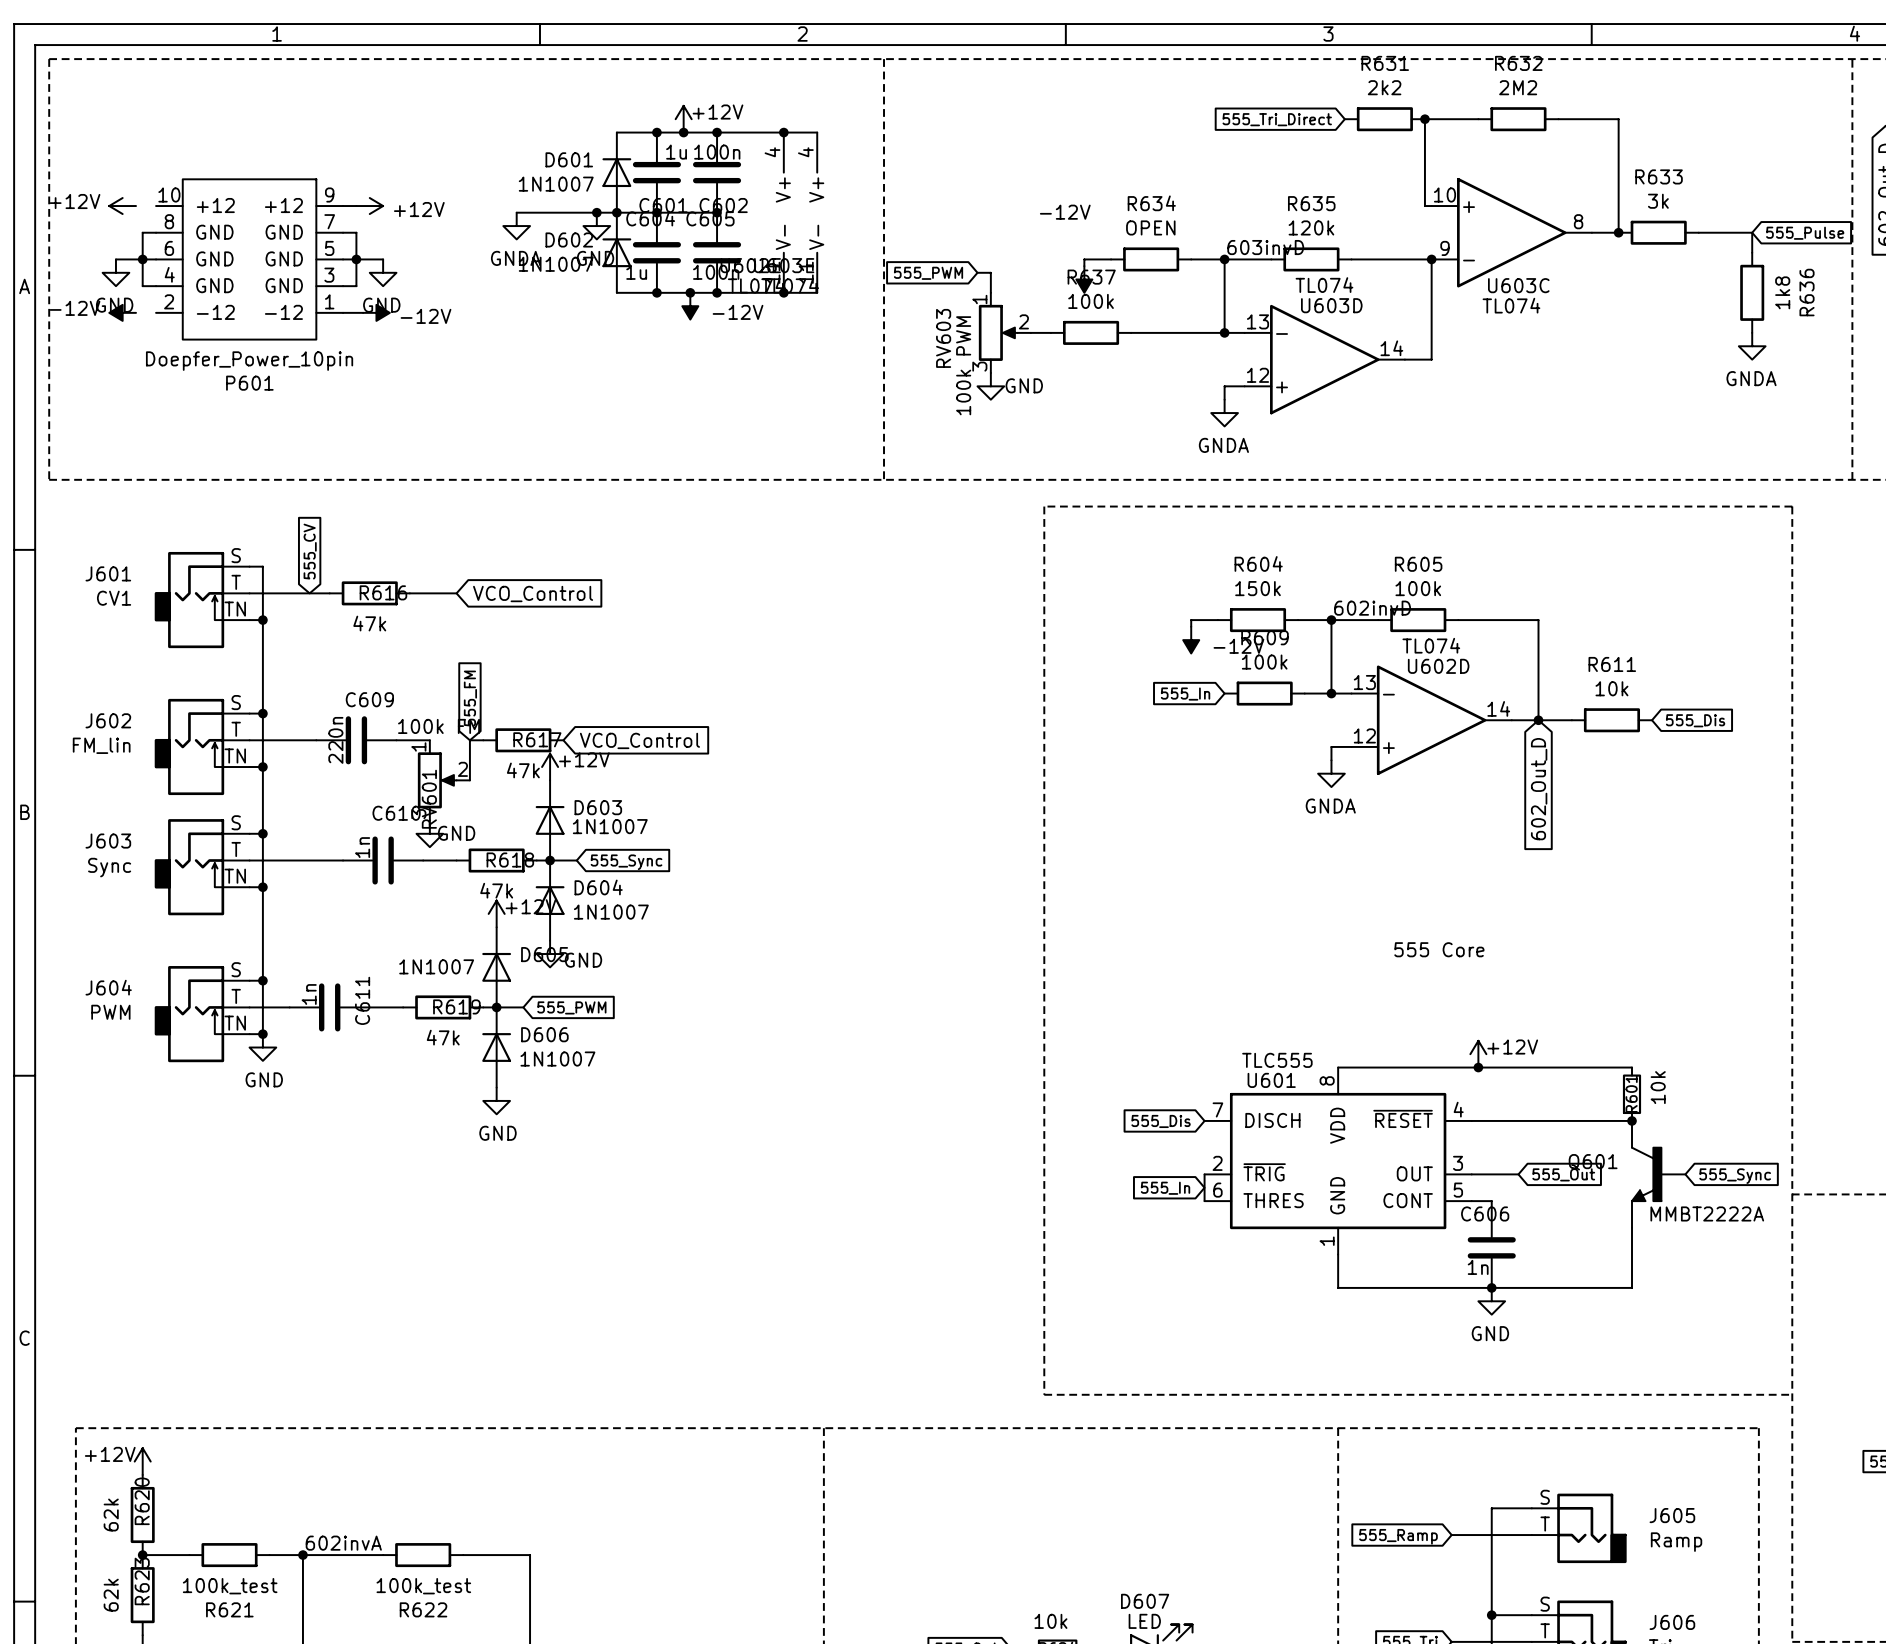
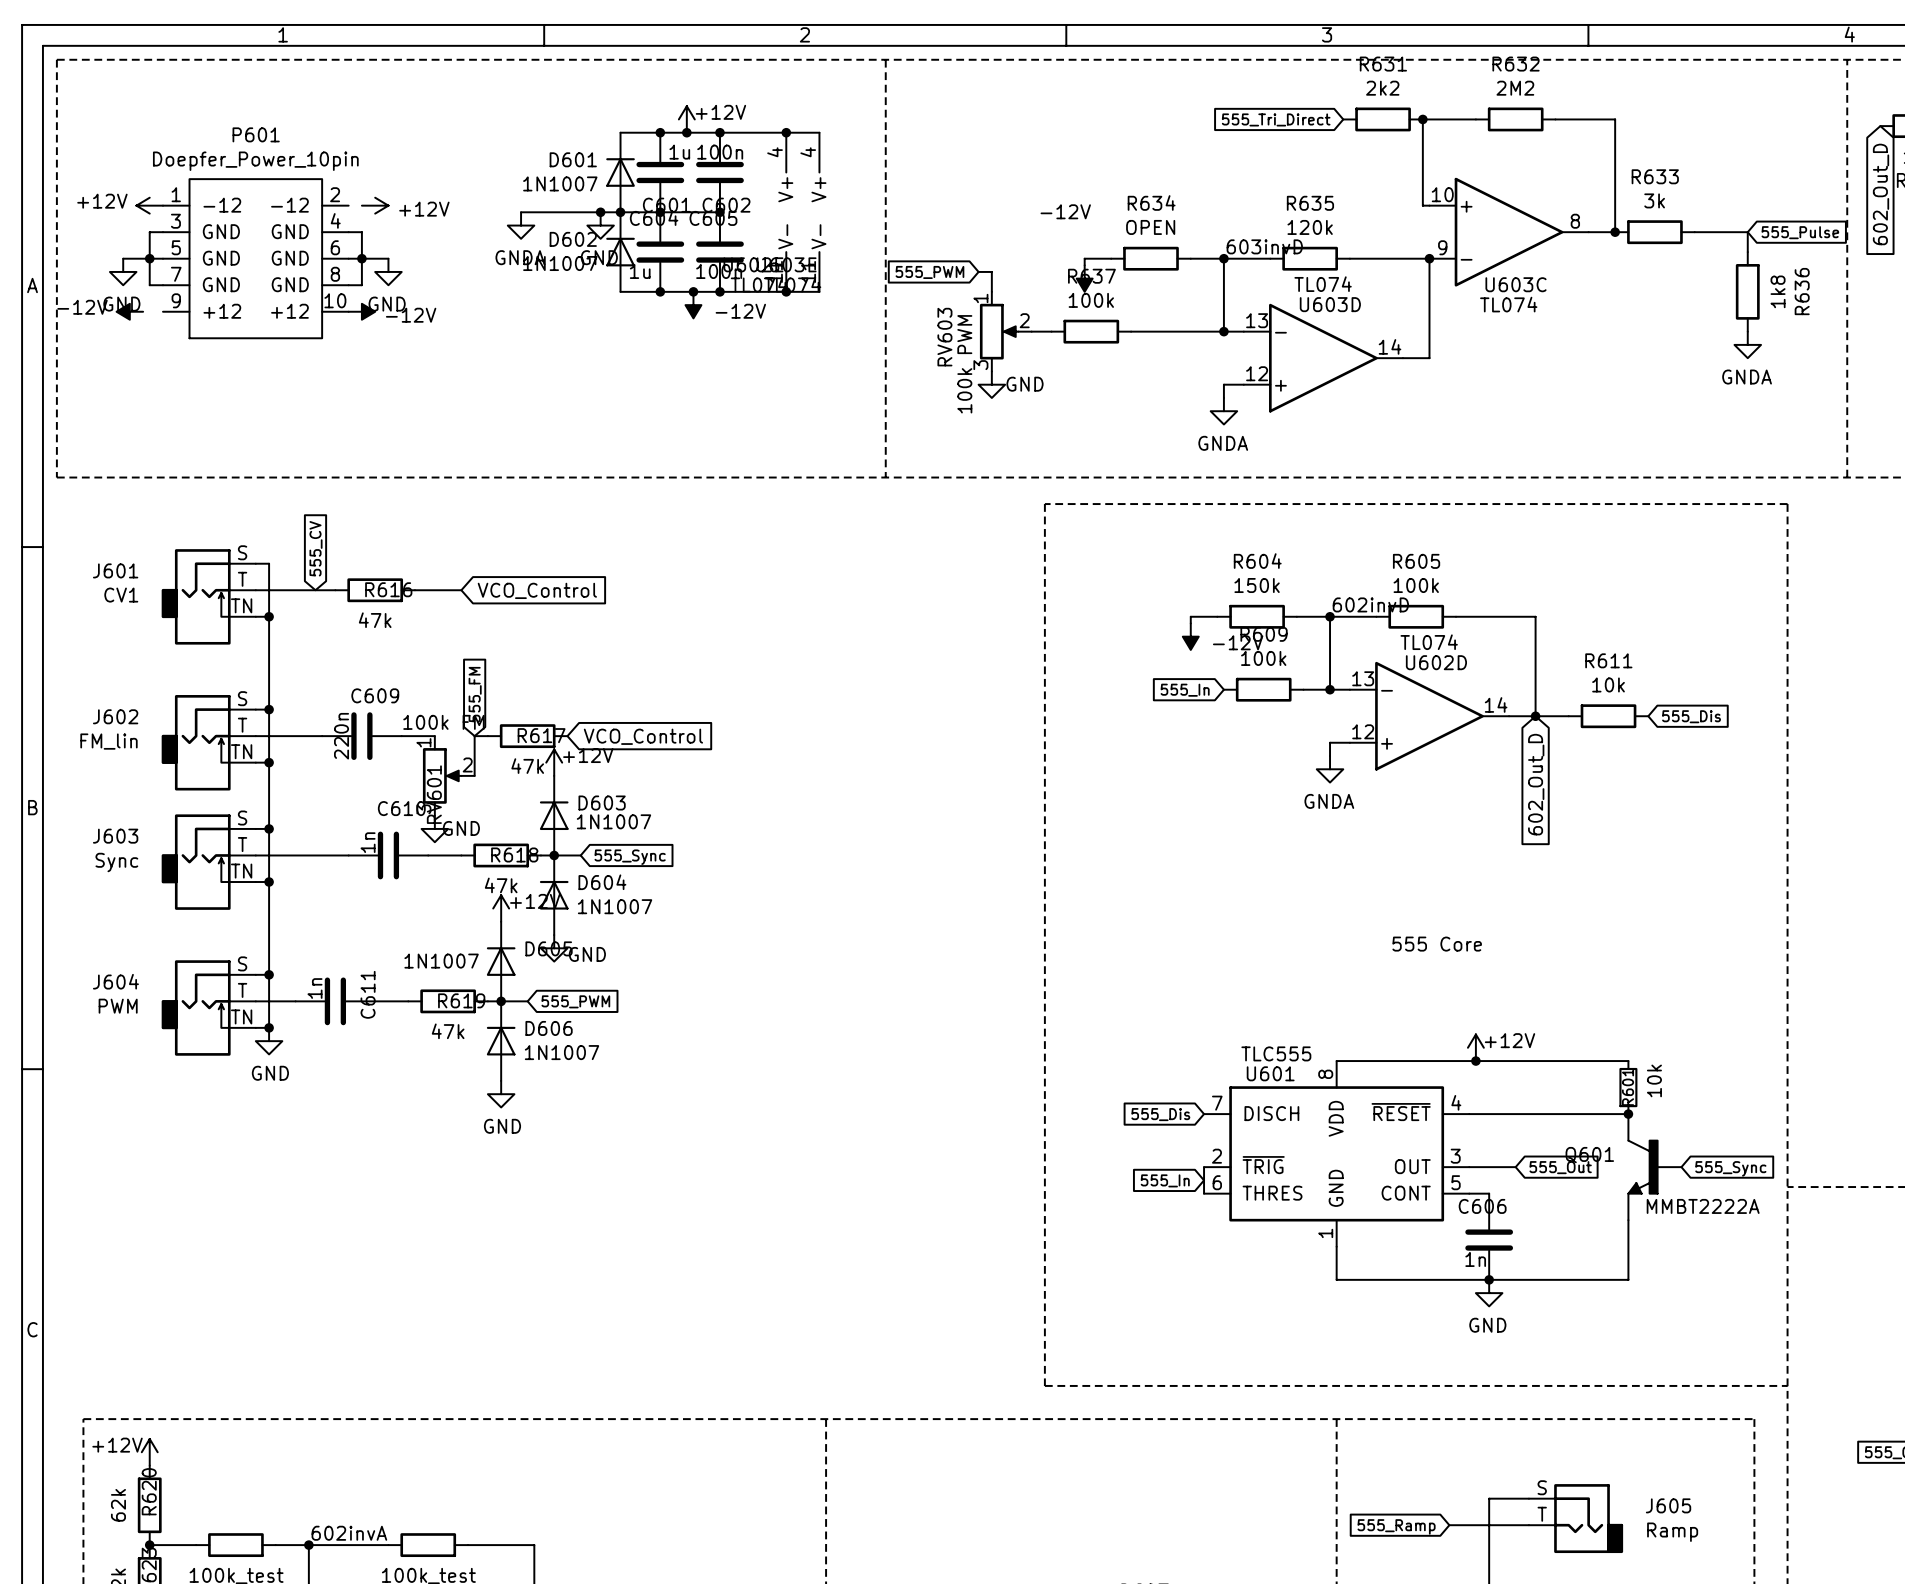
power symbol position: +12V (122, 206) -> +12V (149, 205)
wire: (343, 206) (356, 206) -> none
P601 rotation: 0° (249, 259) -> 180° (255, 258)
power symbol position: -12V (376, 312) -> -12V (361, 311)

